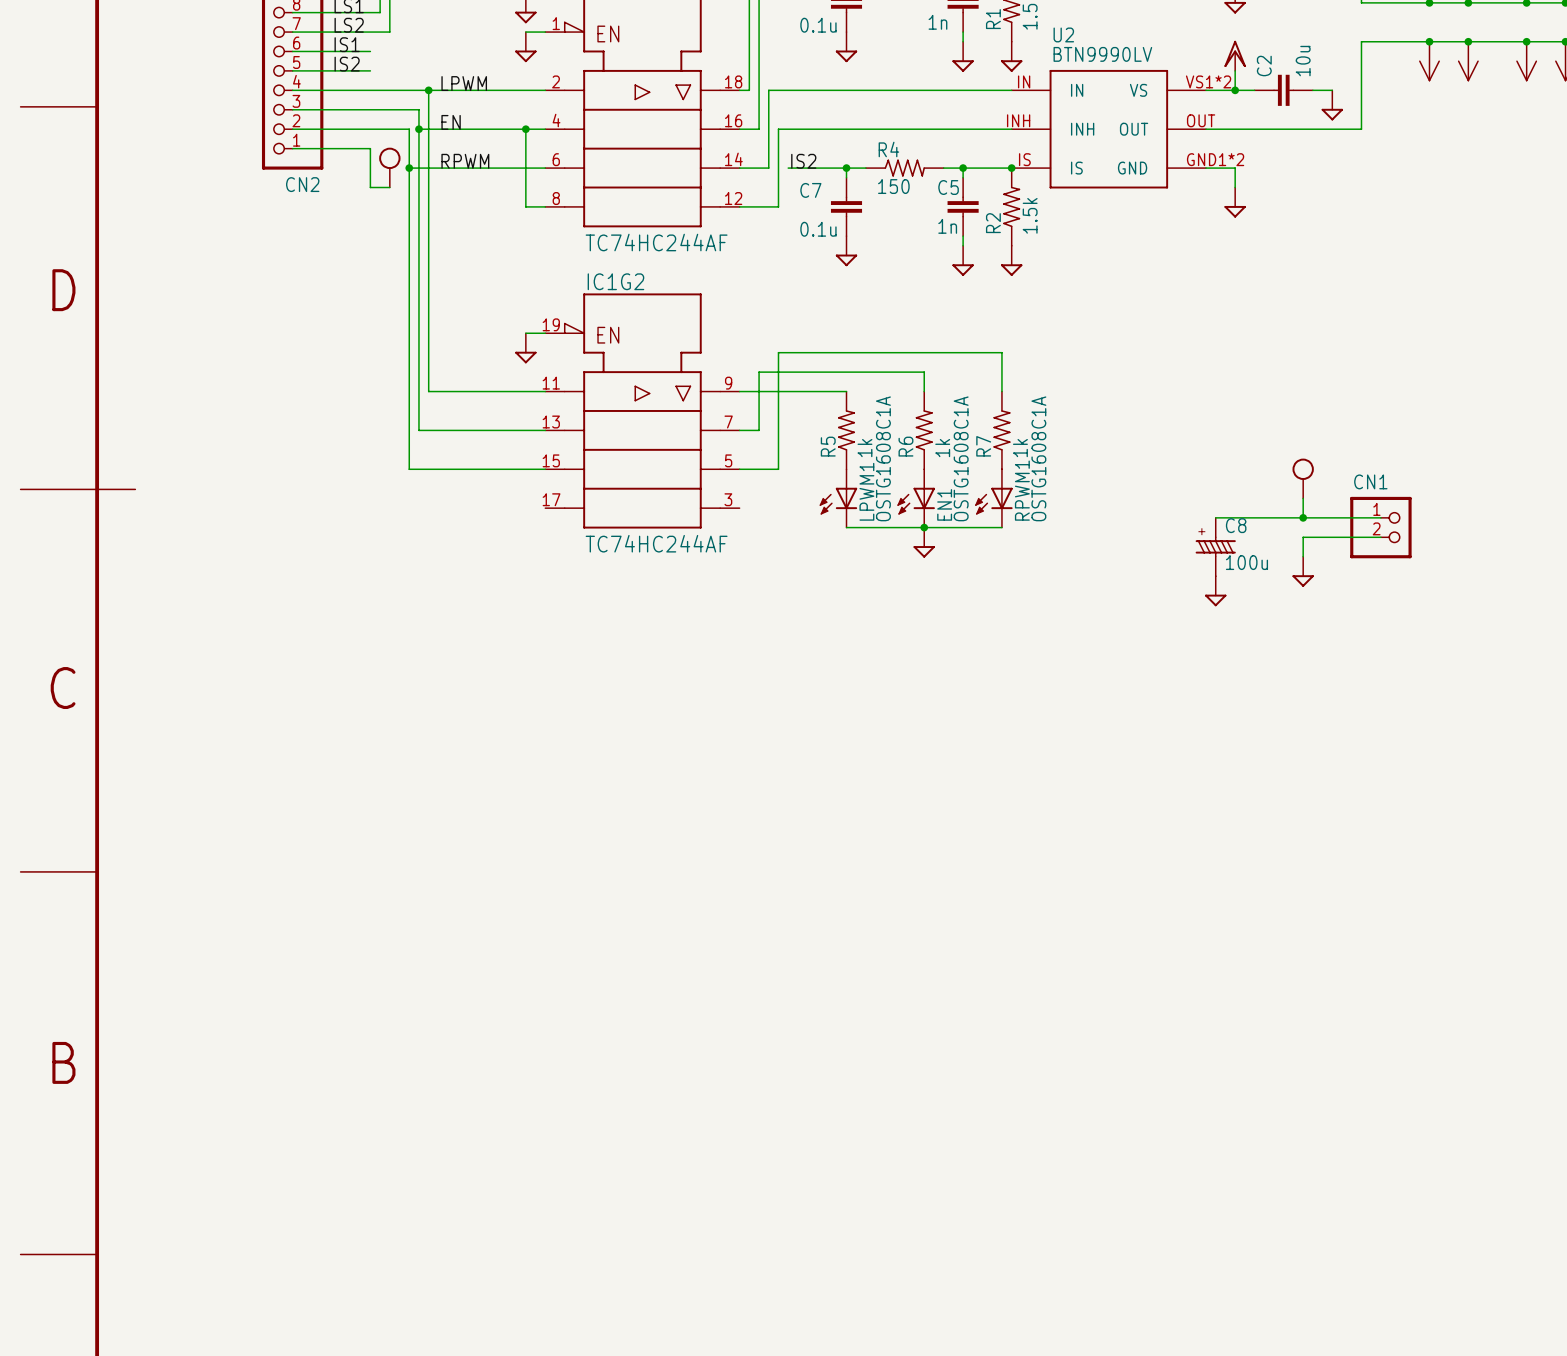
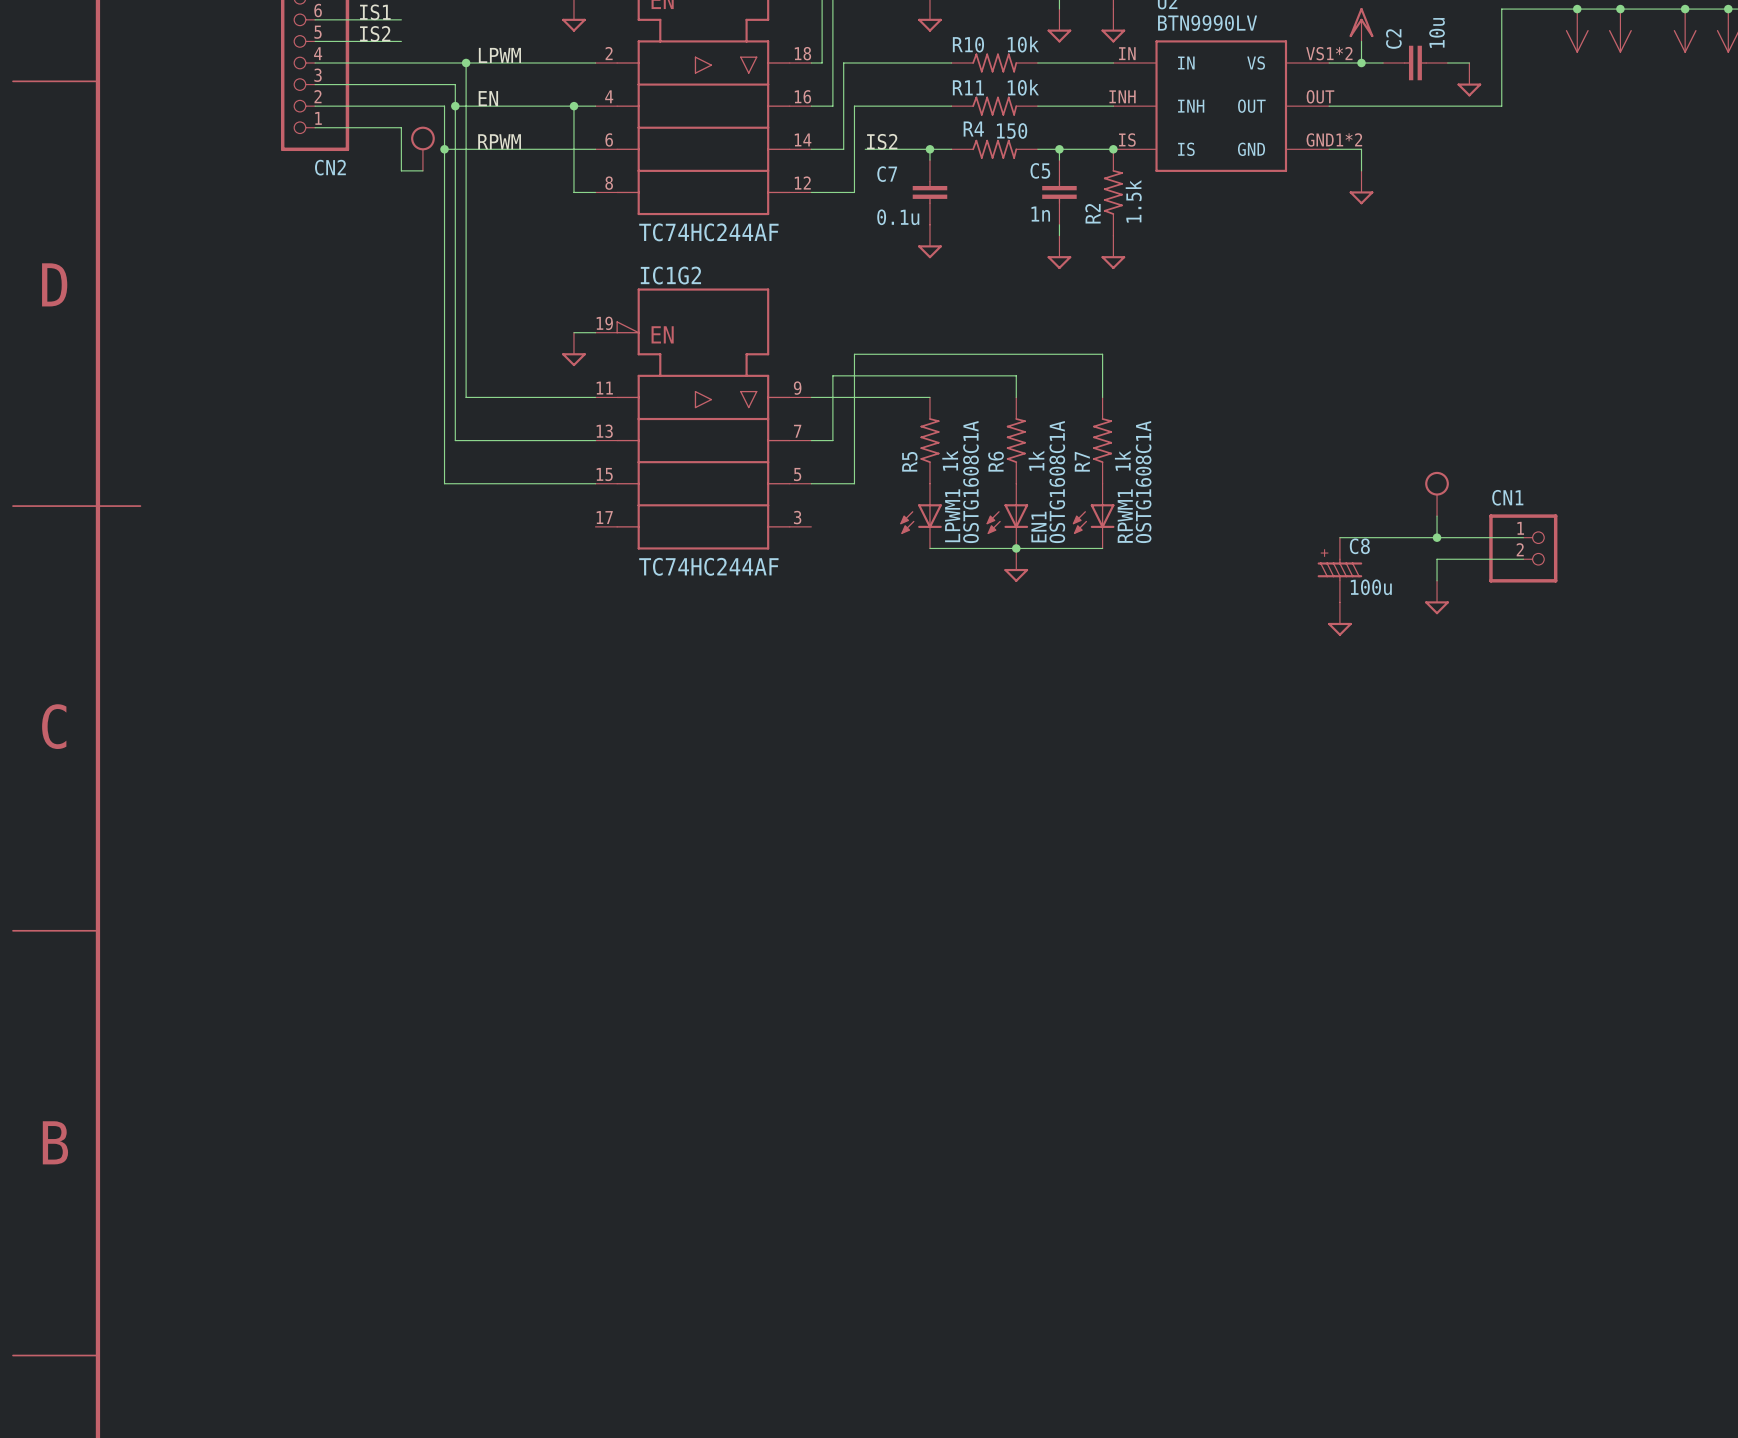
R10: none -> 10k (994, 63)
R11: none -> 10k (994, 106)
R4 value position: 150 (893, 186) -> 150 (1012, 130)

